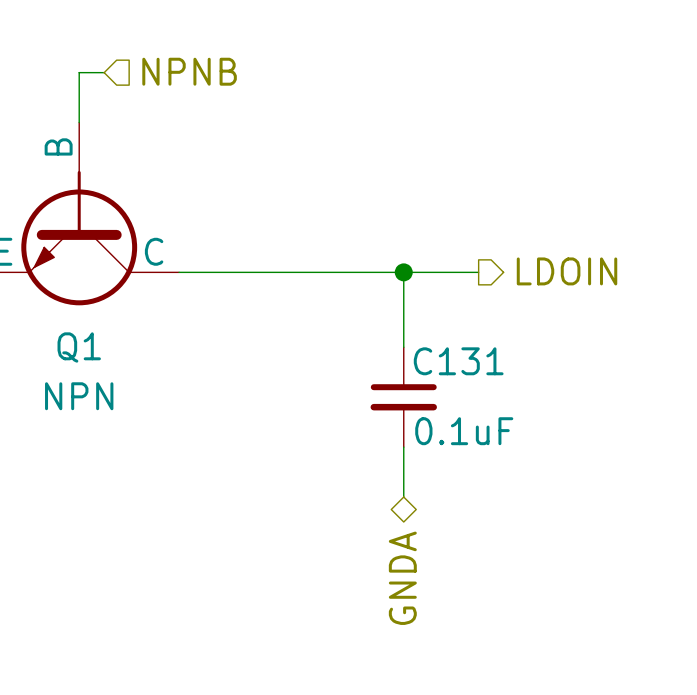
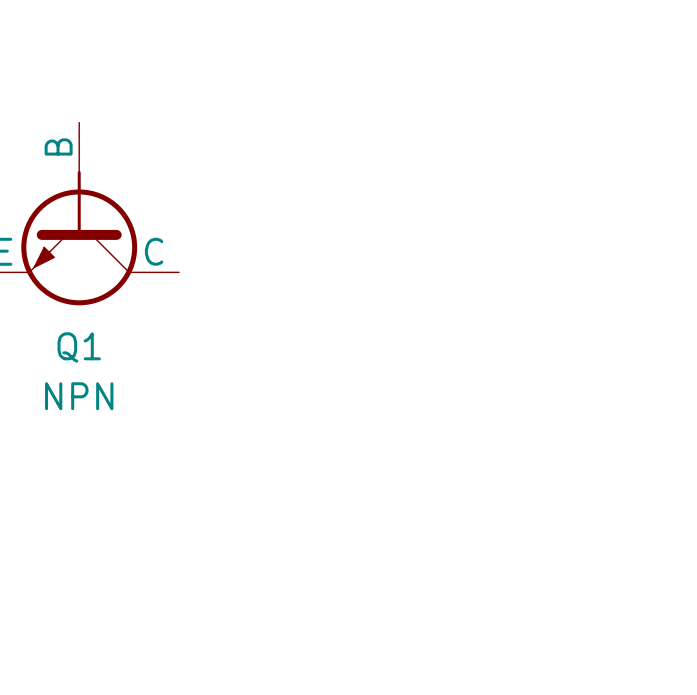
hierarchical label: NPNB (189, 71) -> none
wire: (104, 72) (79, 72) (79, 122) -> none
hierarchical label: LDOIN (567, 271) -> none
wire: (179, 272) (478, 272) -> none
wire: (403, 272) (403, 347) -> none
junction: (403, 272) -> none
C131: 0.1uF (403, 397) -> none
wire: (403, 447) (403, 497) -> none
hierarchical label: GNDA (402, 578) -> none

